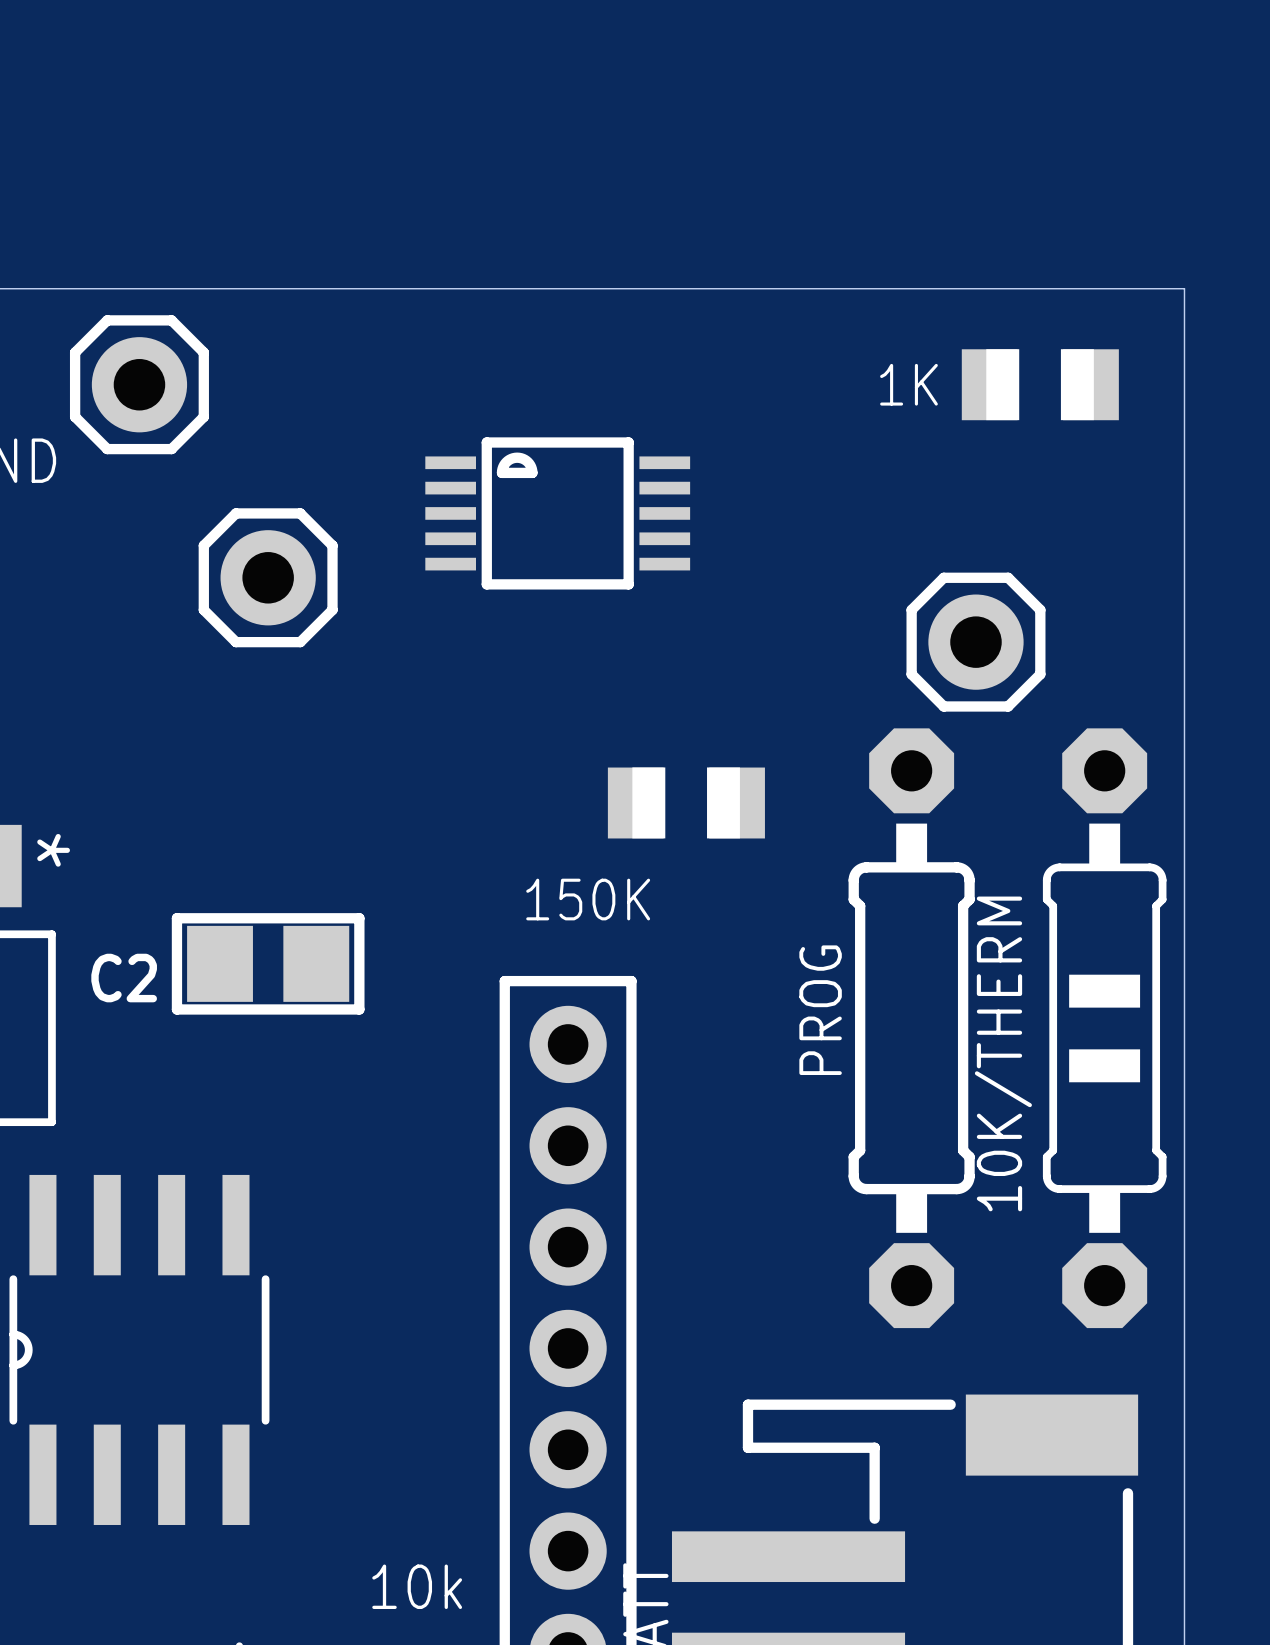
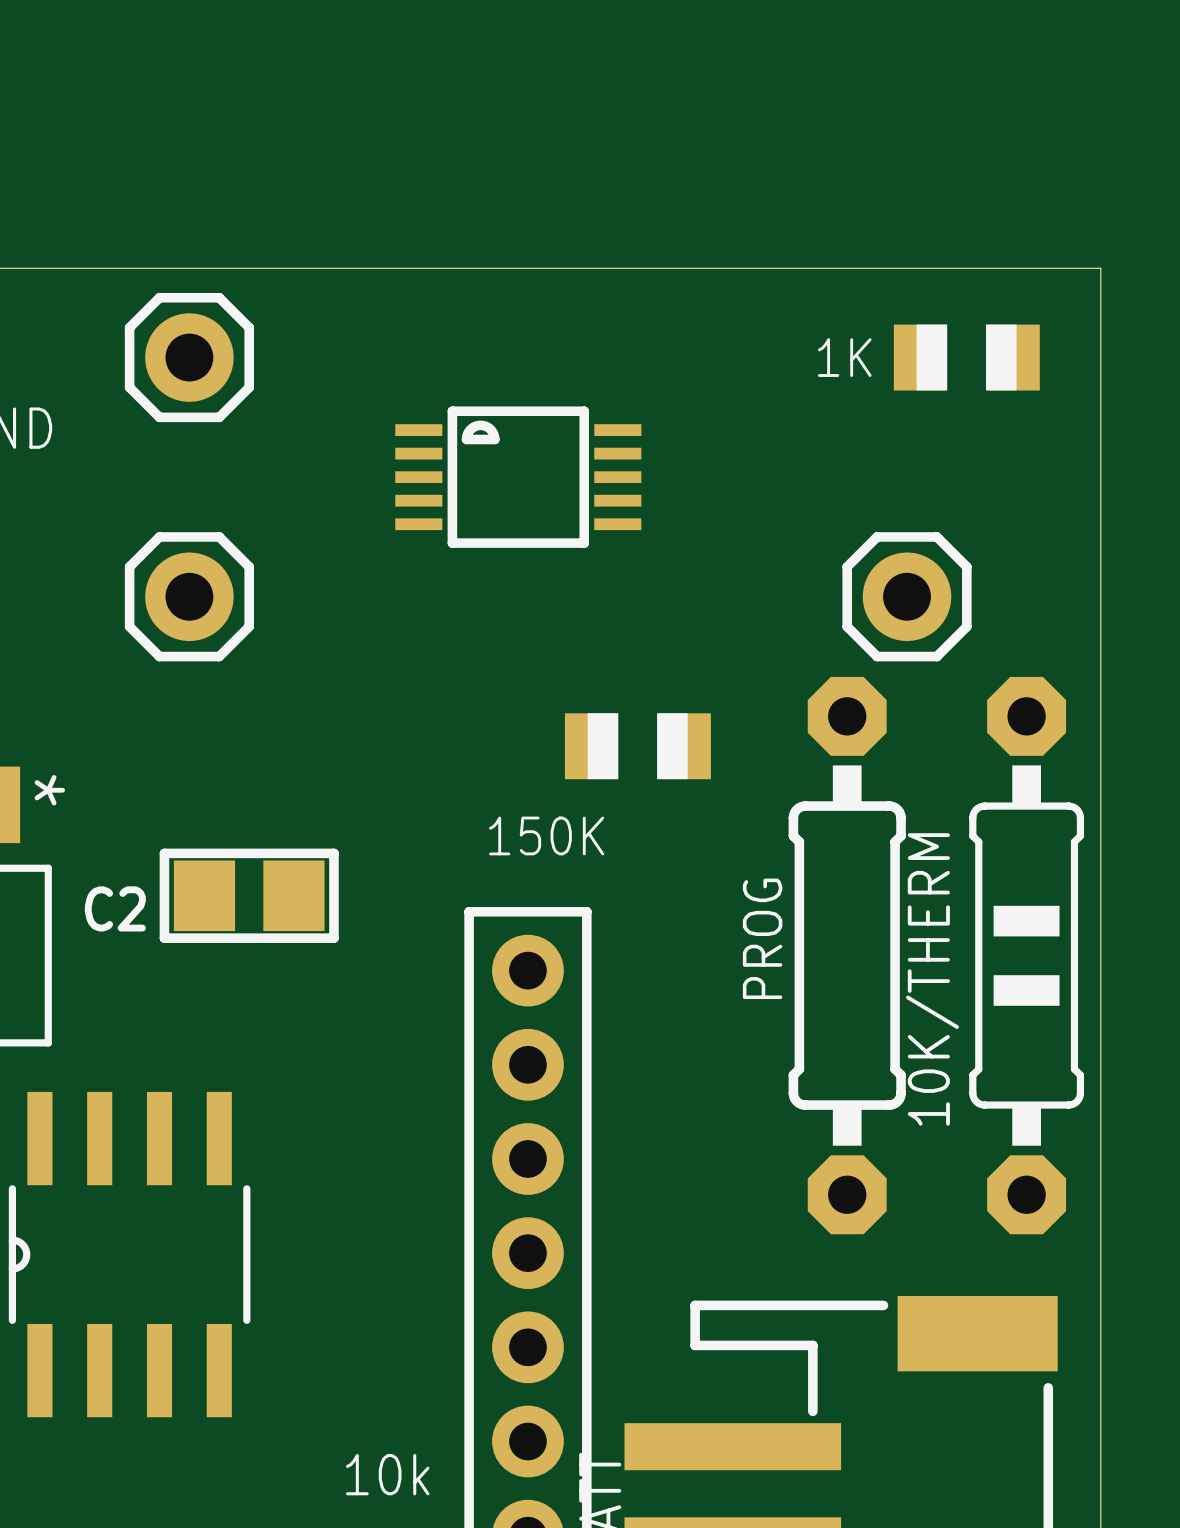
part position: (139, 384) -> (189, 357)
part position: (268, 577) -> (189, 596)

